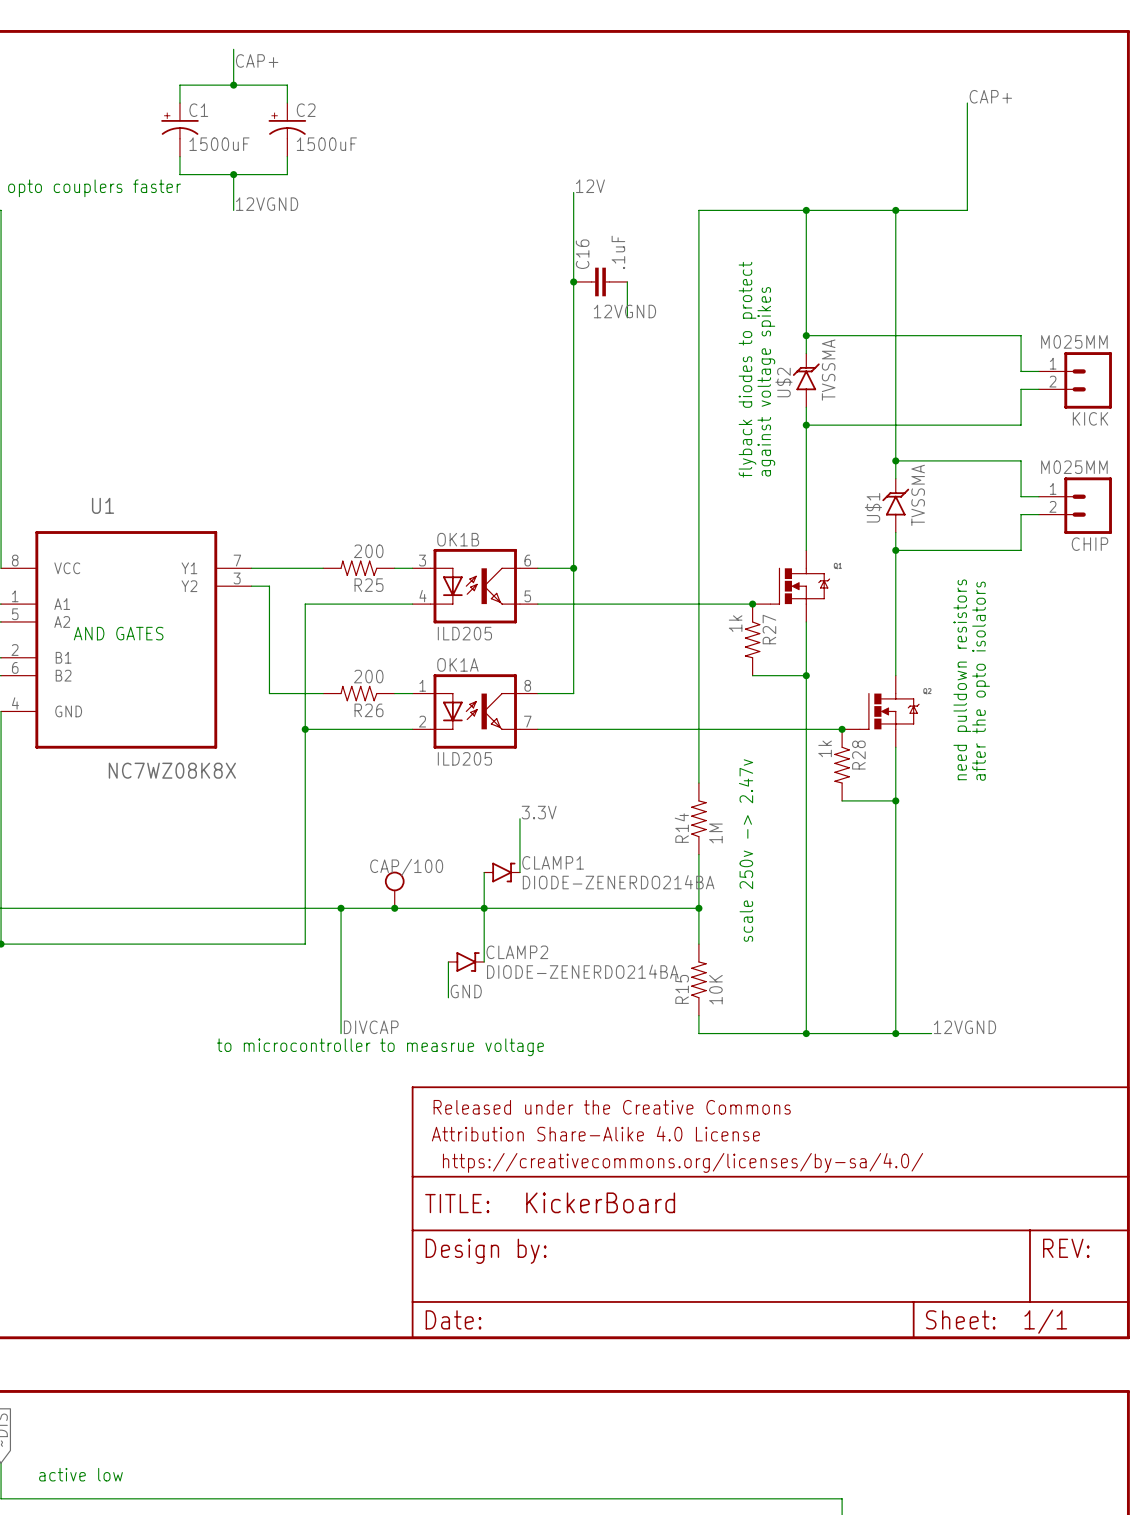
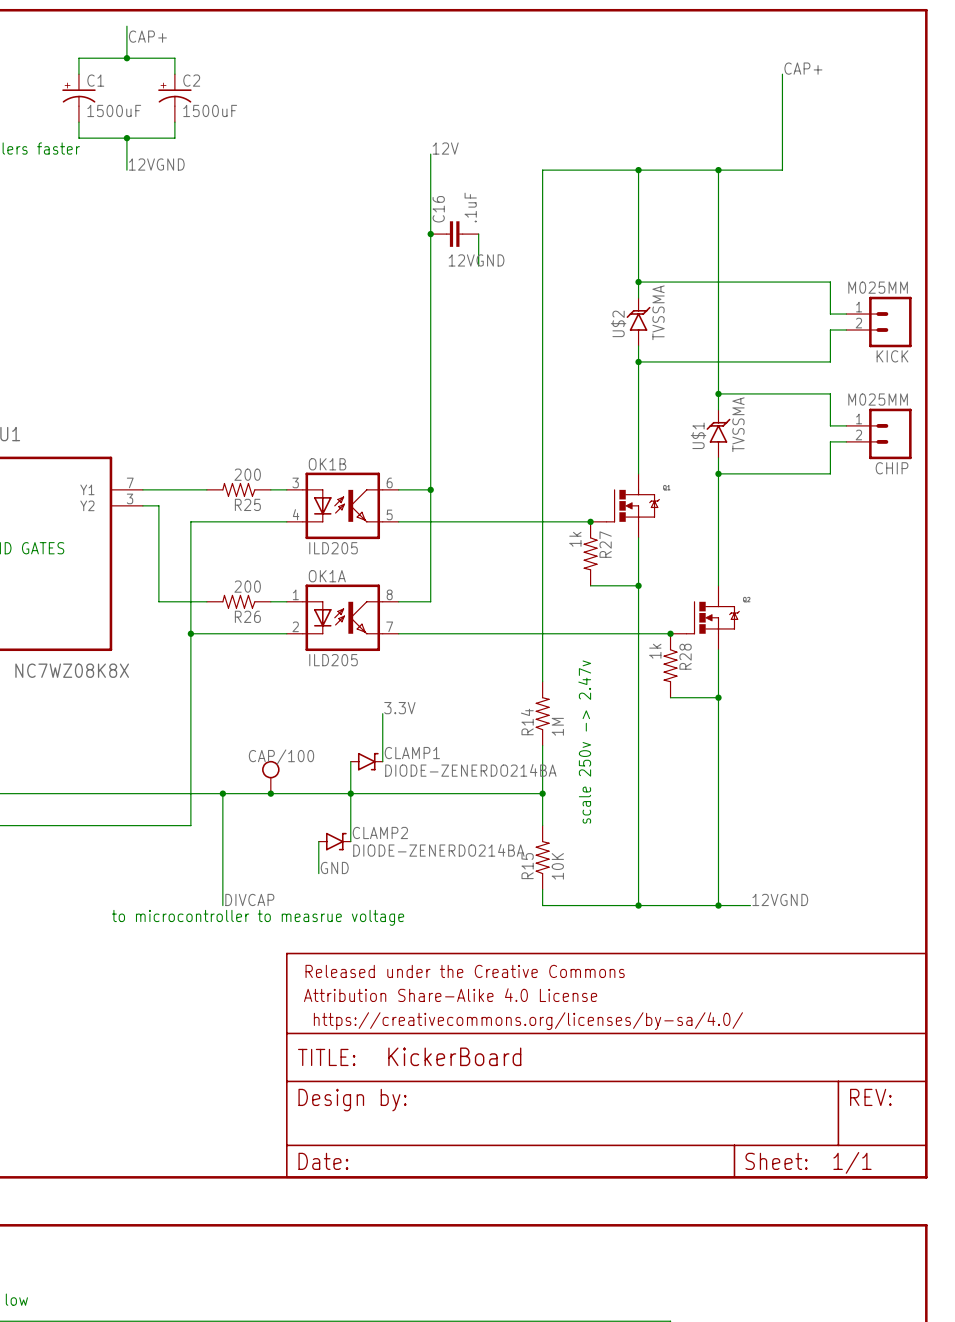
text: flyback diodes to protect (747, 369) -> none
text: against voltage spikes (766, 381) -> none
text: need pulldown resistors (962, 679) -> none
text: after the opto isolators (981, 681) -> none

